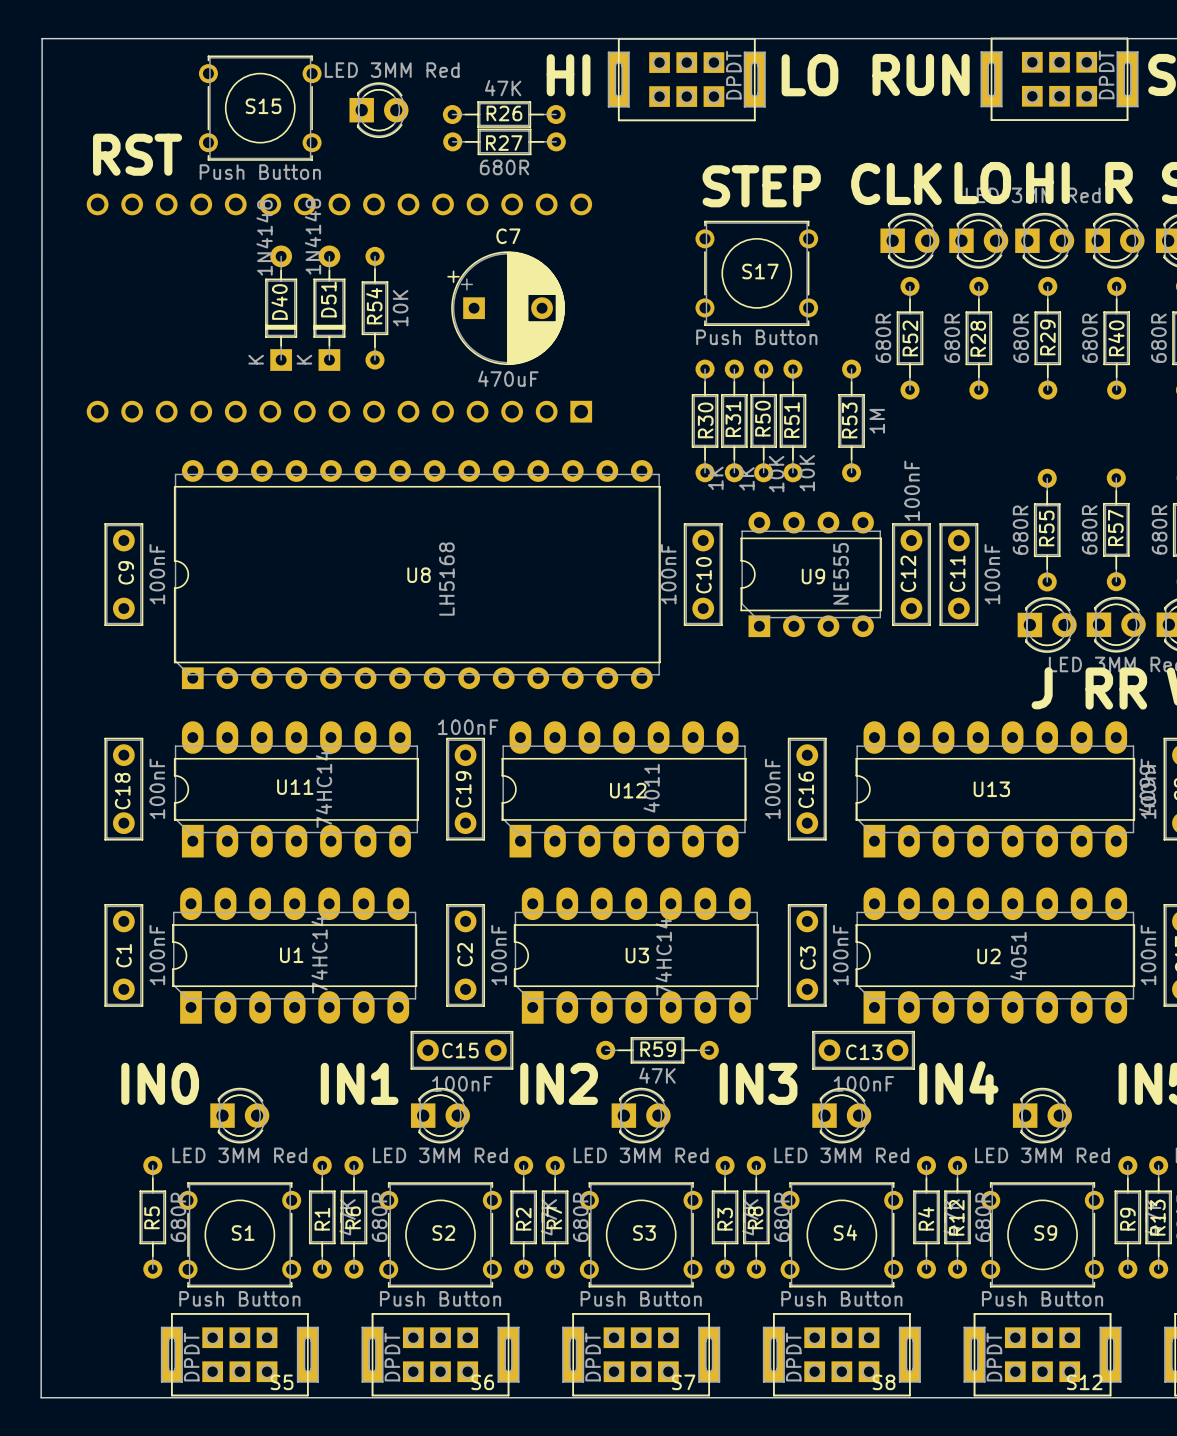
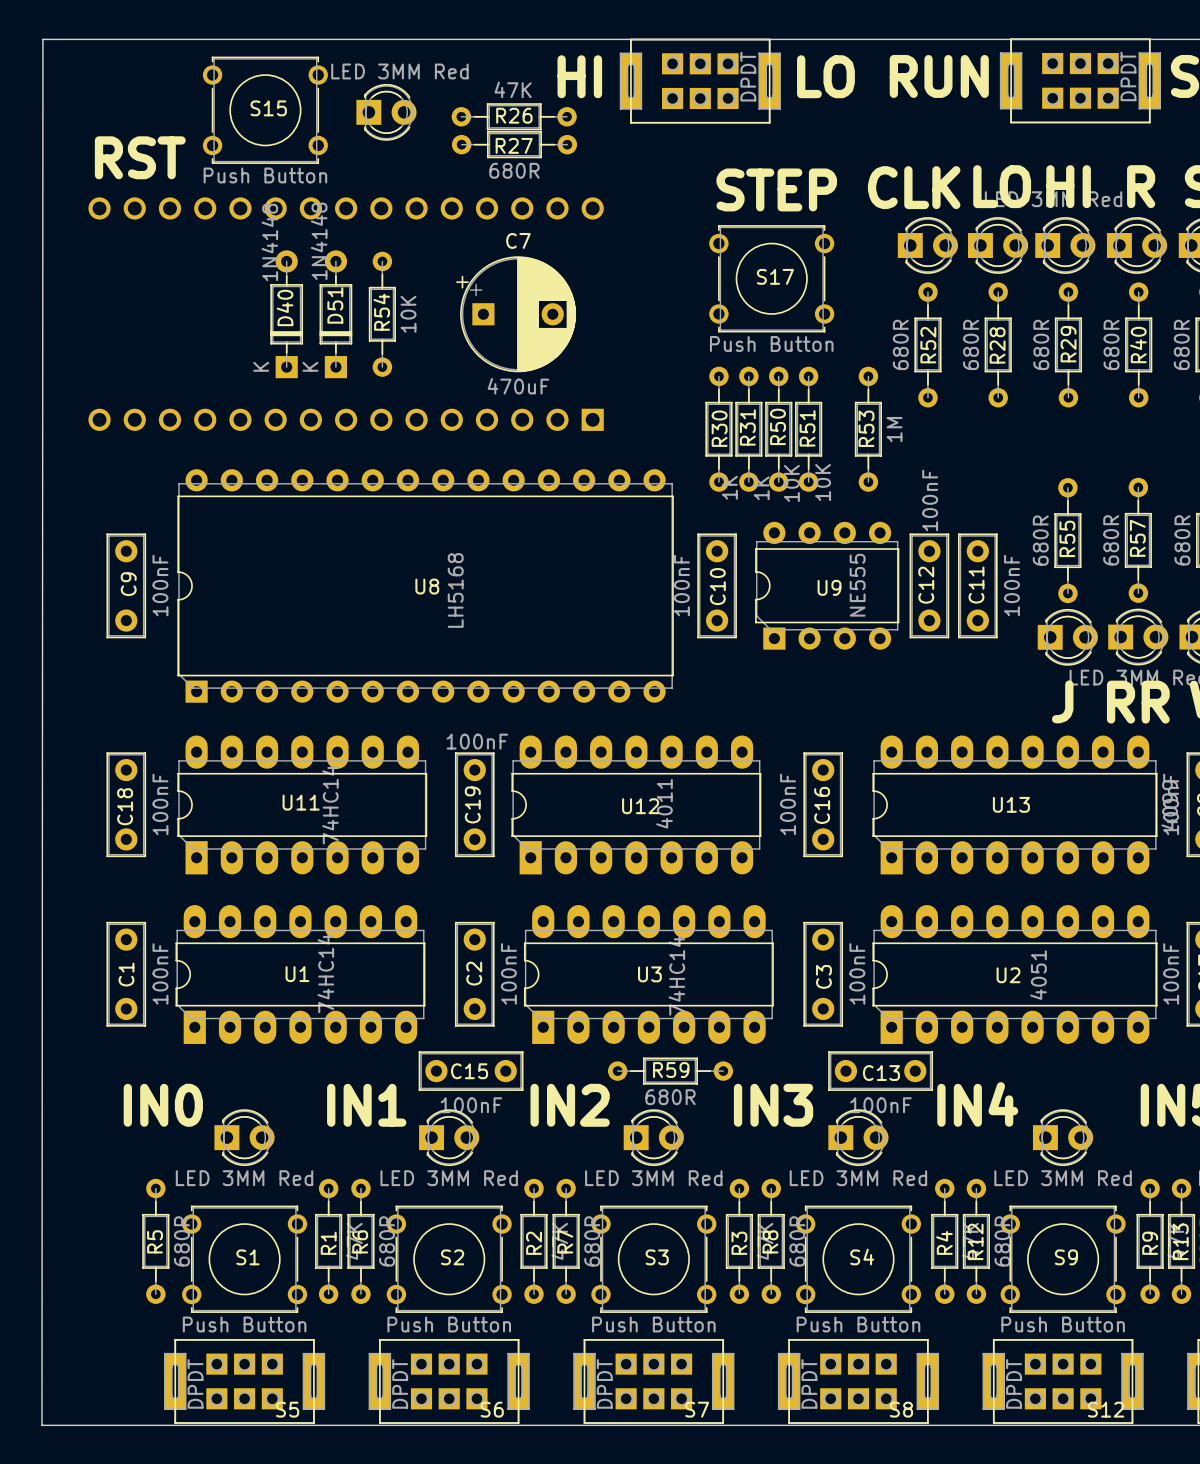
R59 value: 47K (657, 1075) -> 680R (670, 1097)

